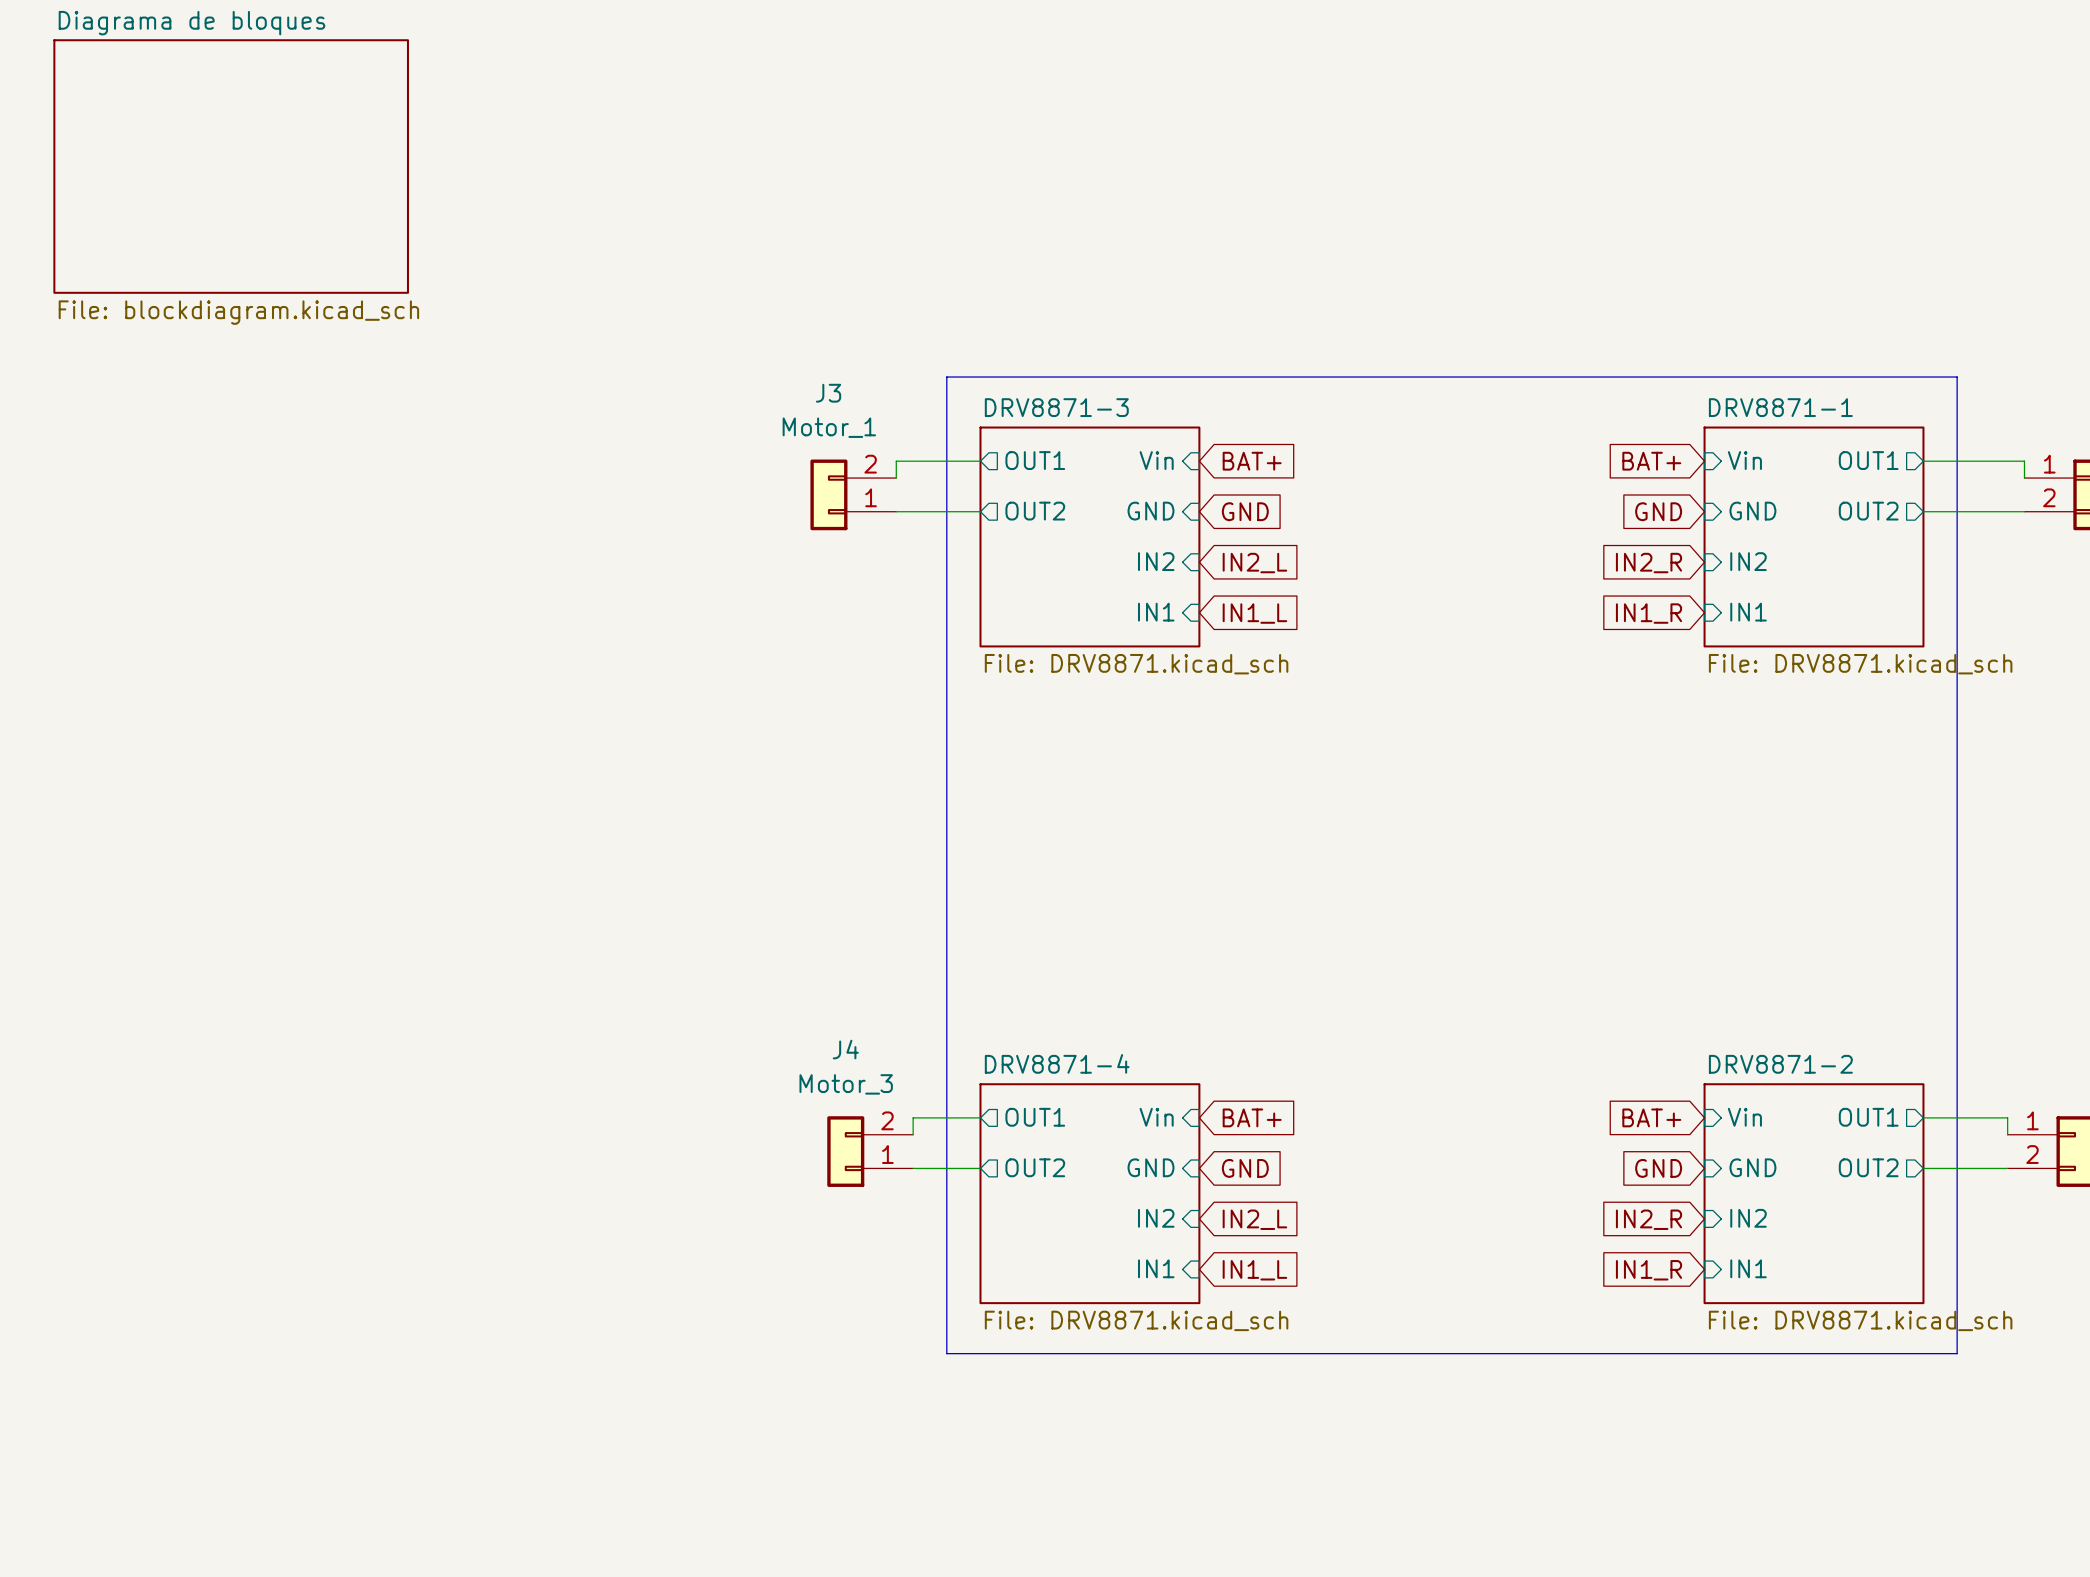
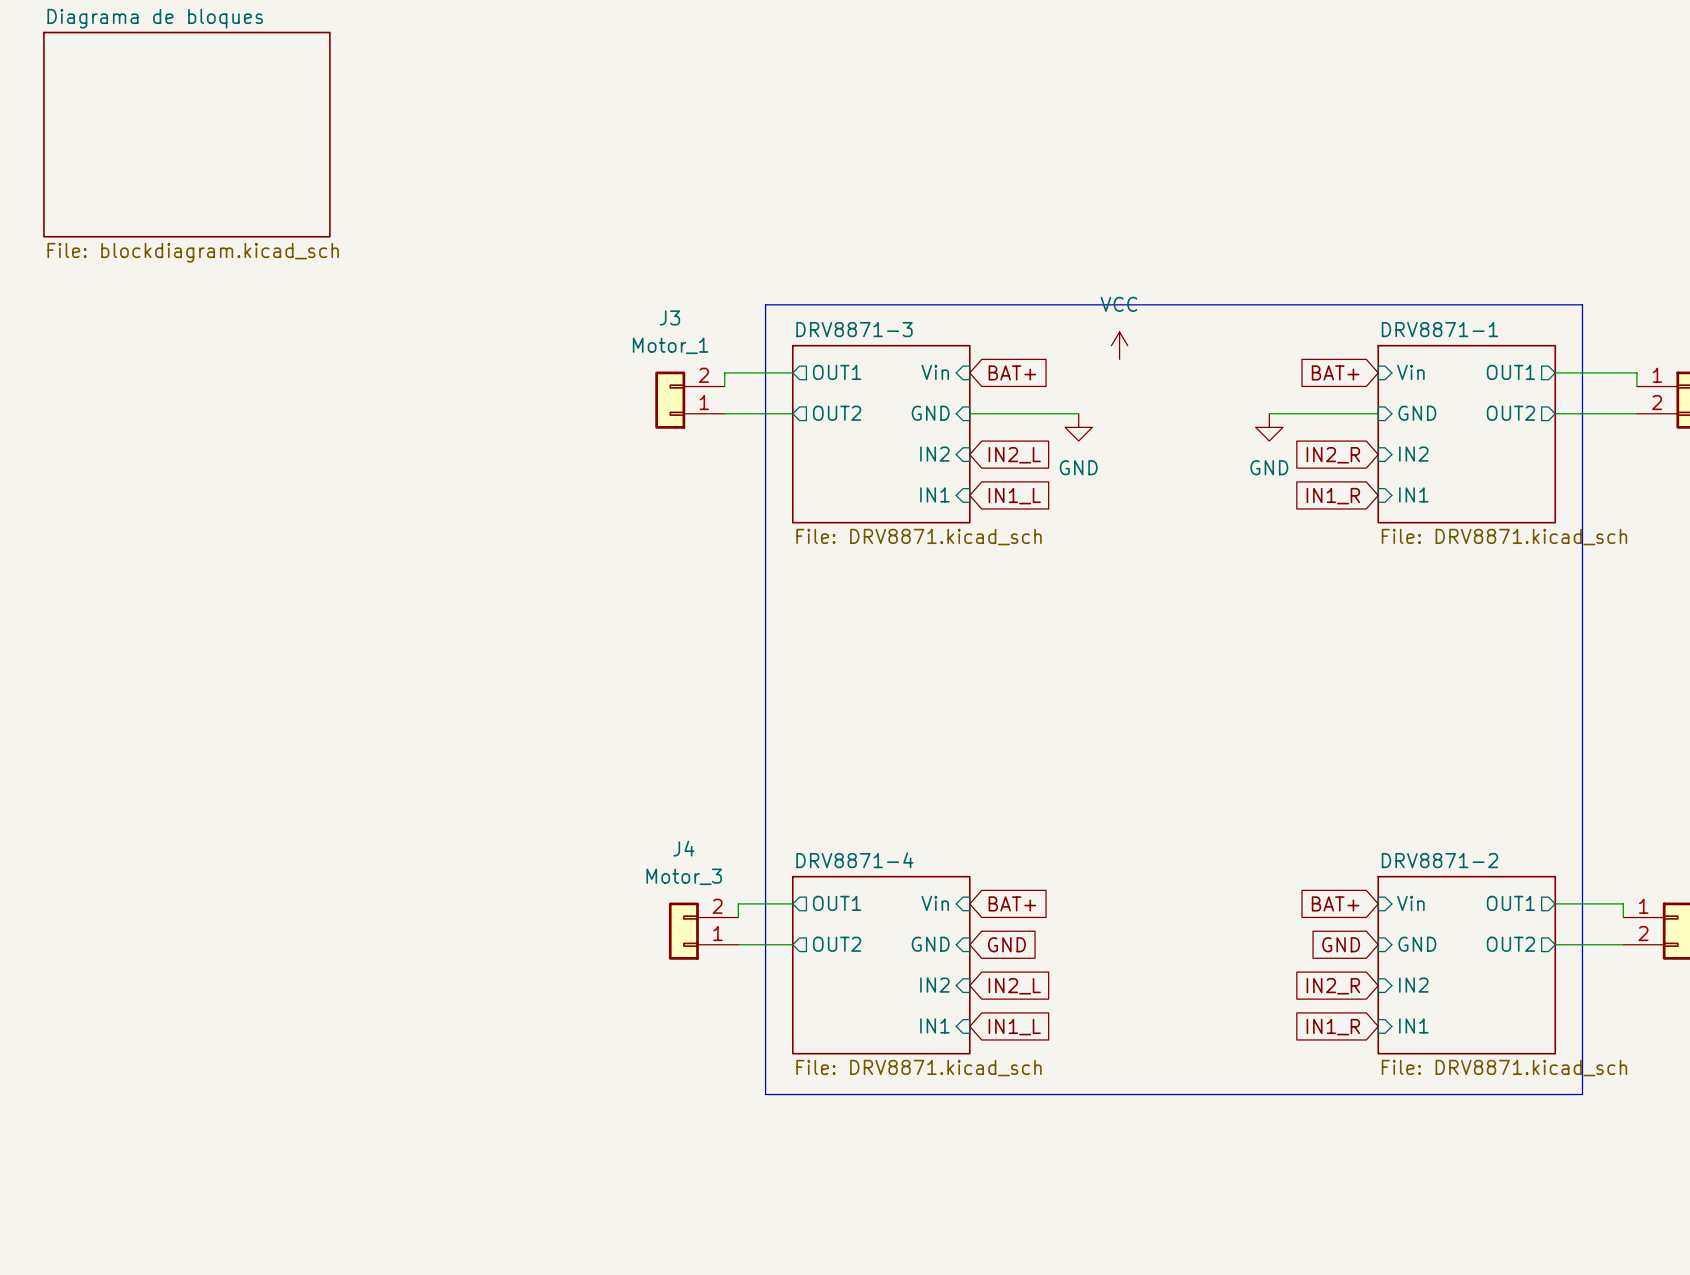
power symbol: none -> VCC (1119, 345)
wire: none -> (969, 413) (1078, 413)
global label: GND (1245, 511) -> none
wire: none -> (1269, 413) (1378, 413)
global label: GND (1658, 511) -> none
power symbol: none -> GND (1078, 427)
power symbol: none -> GND (1269, 427)

